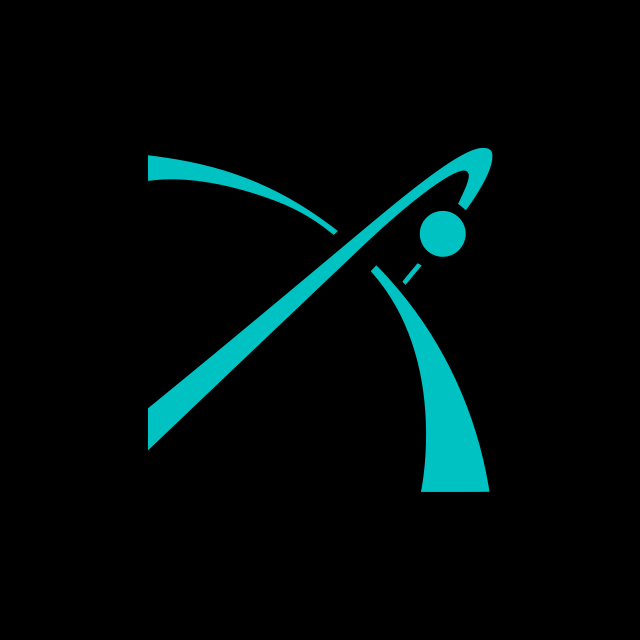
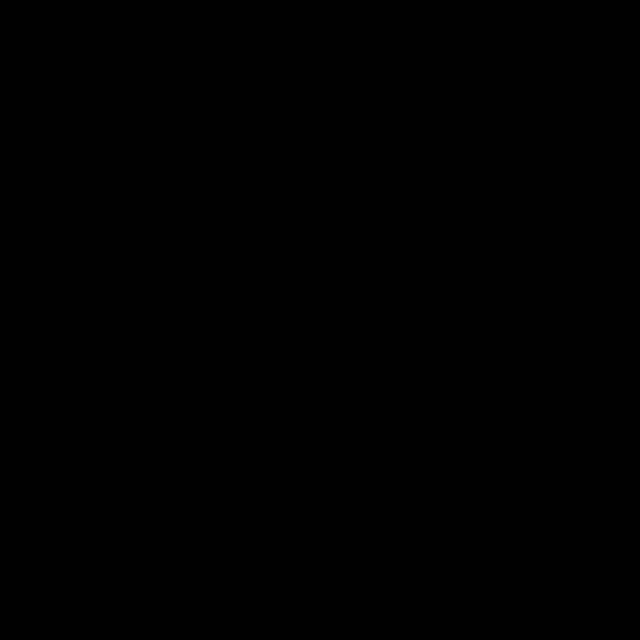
drawing: [147, 147, 493, 492] -> none

